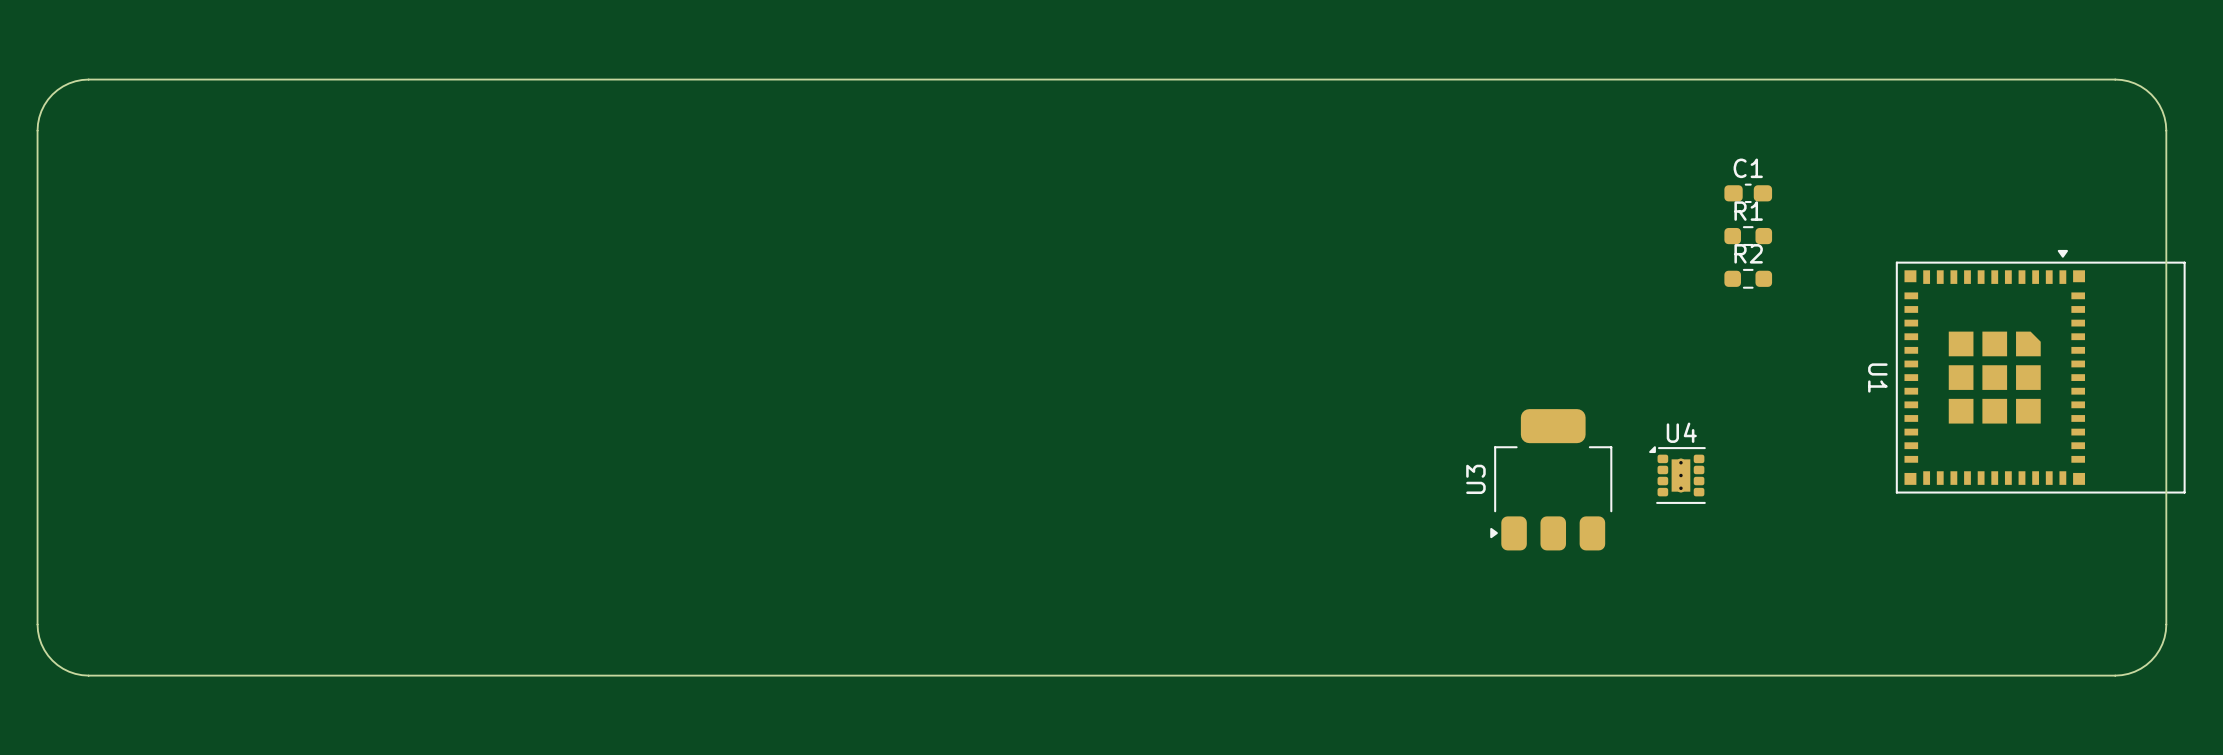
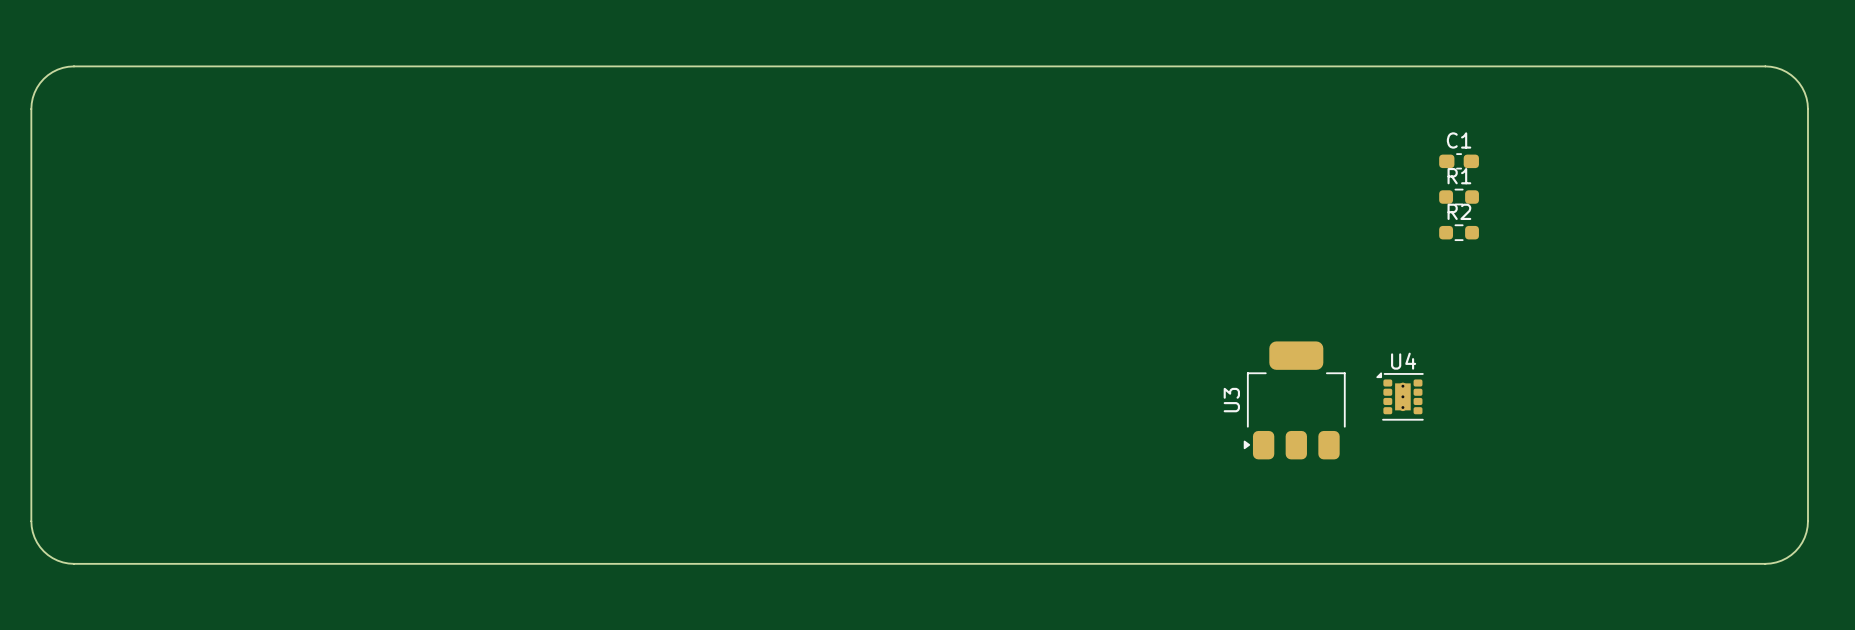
U1: (2040, 371) -> none

